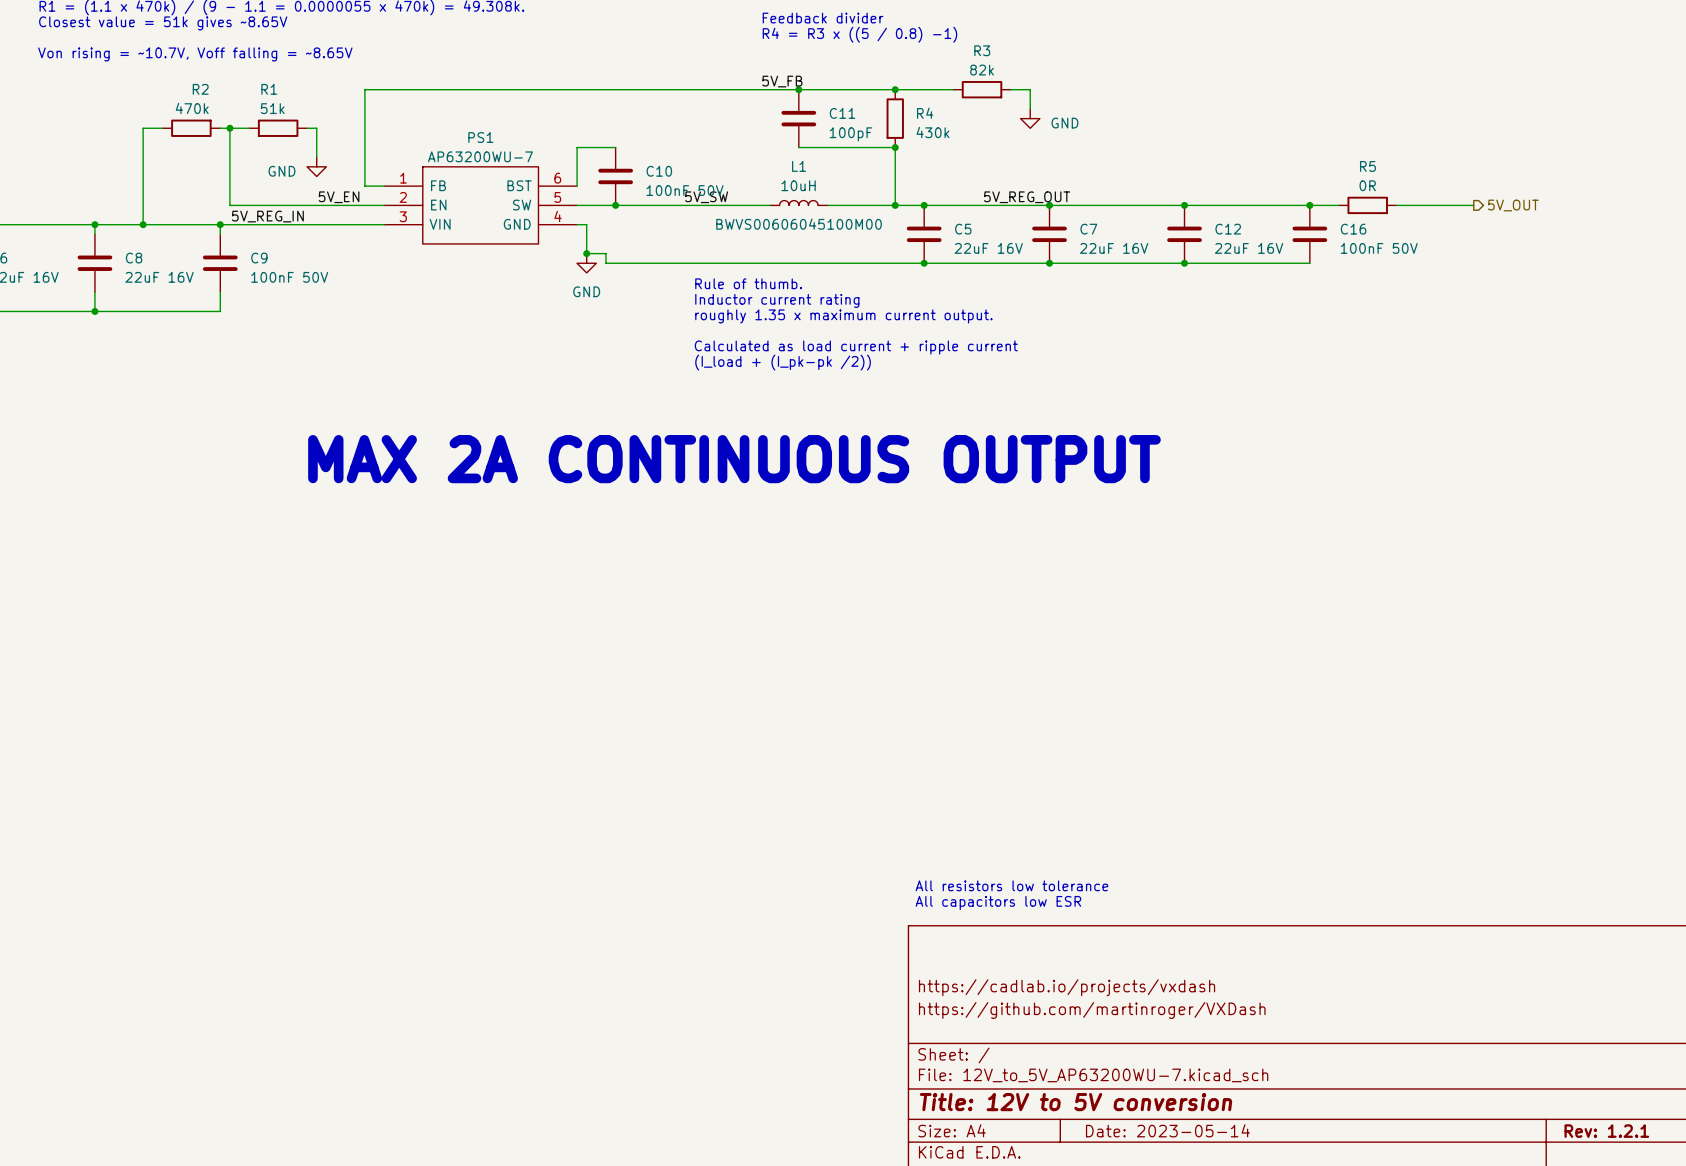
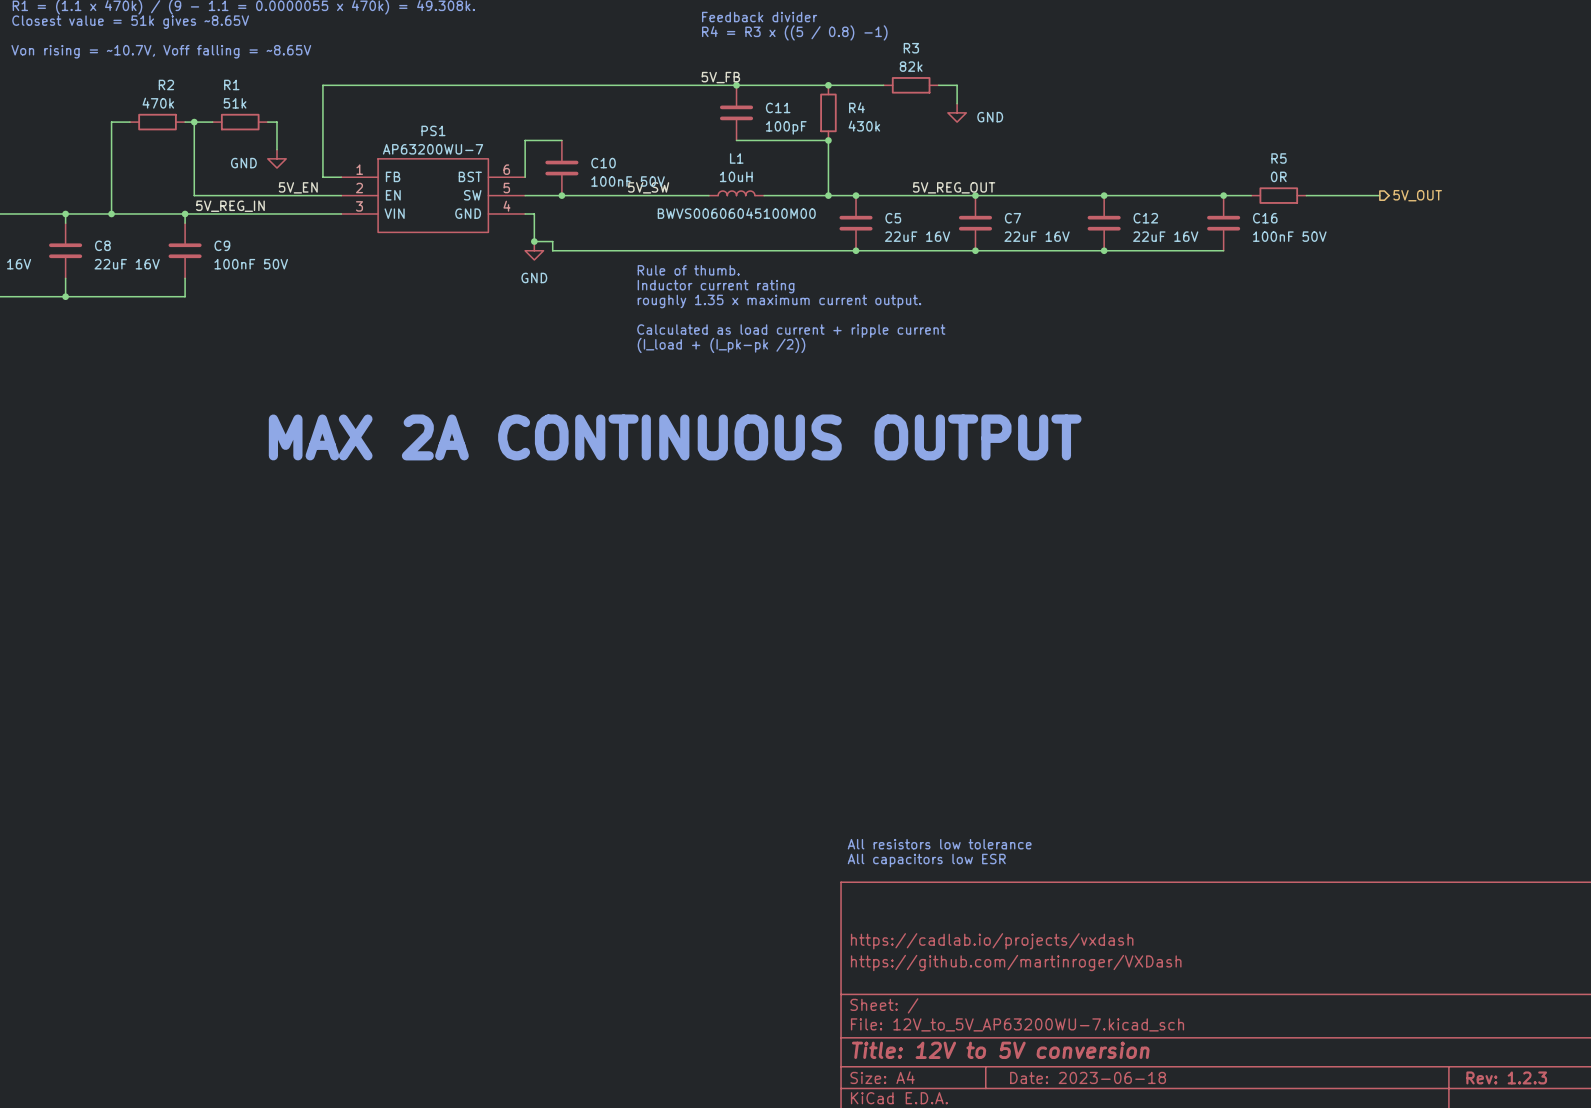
title block: Date: 2023-05-14 (1167, 1130) -> Date: 2023-06-18 (1088, 1077)
title block: Rev: 1.2.1 (1606, 1131) -> Rev: 1.2.3 (1506, 1077)

